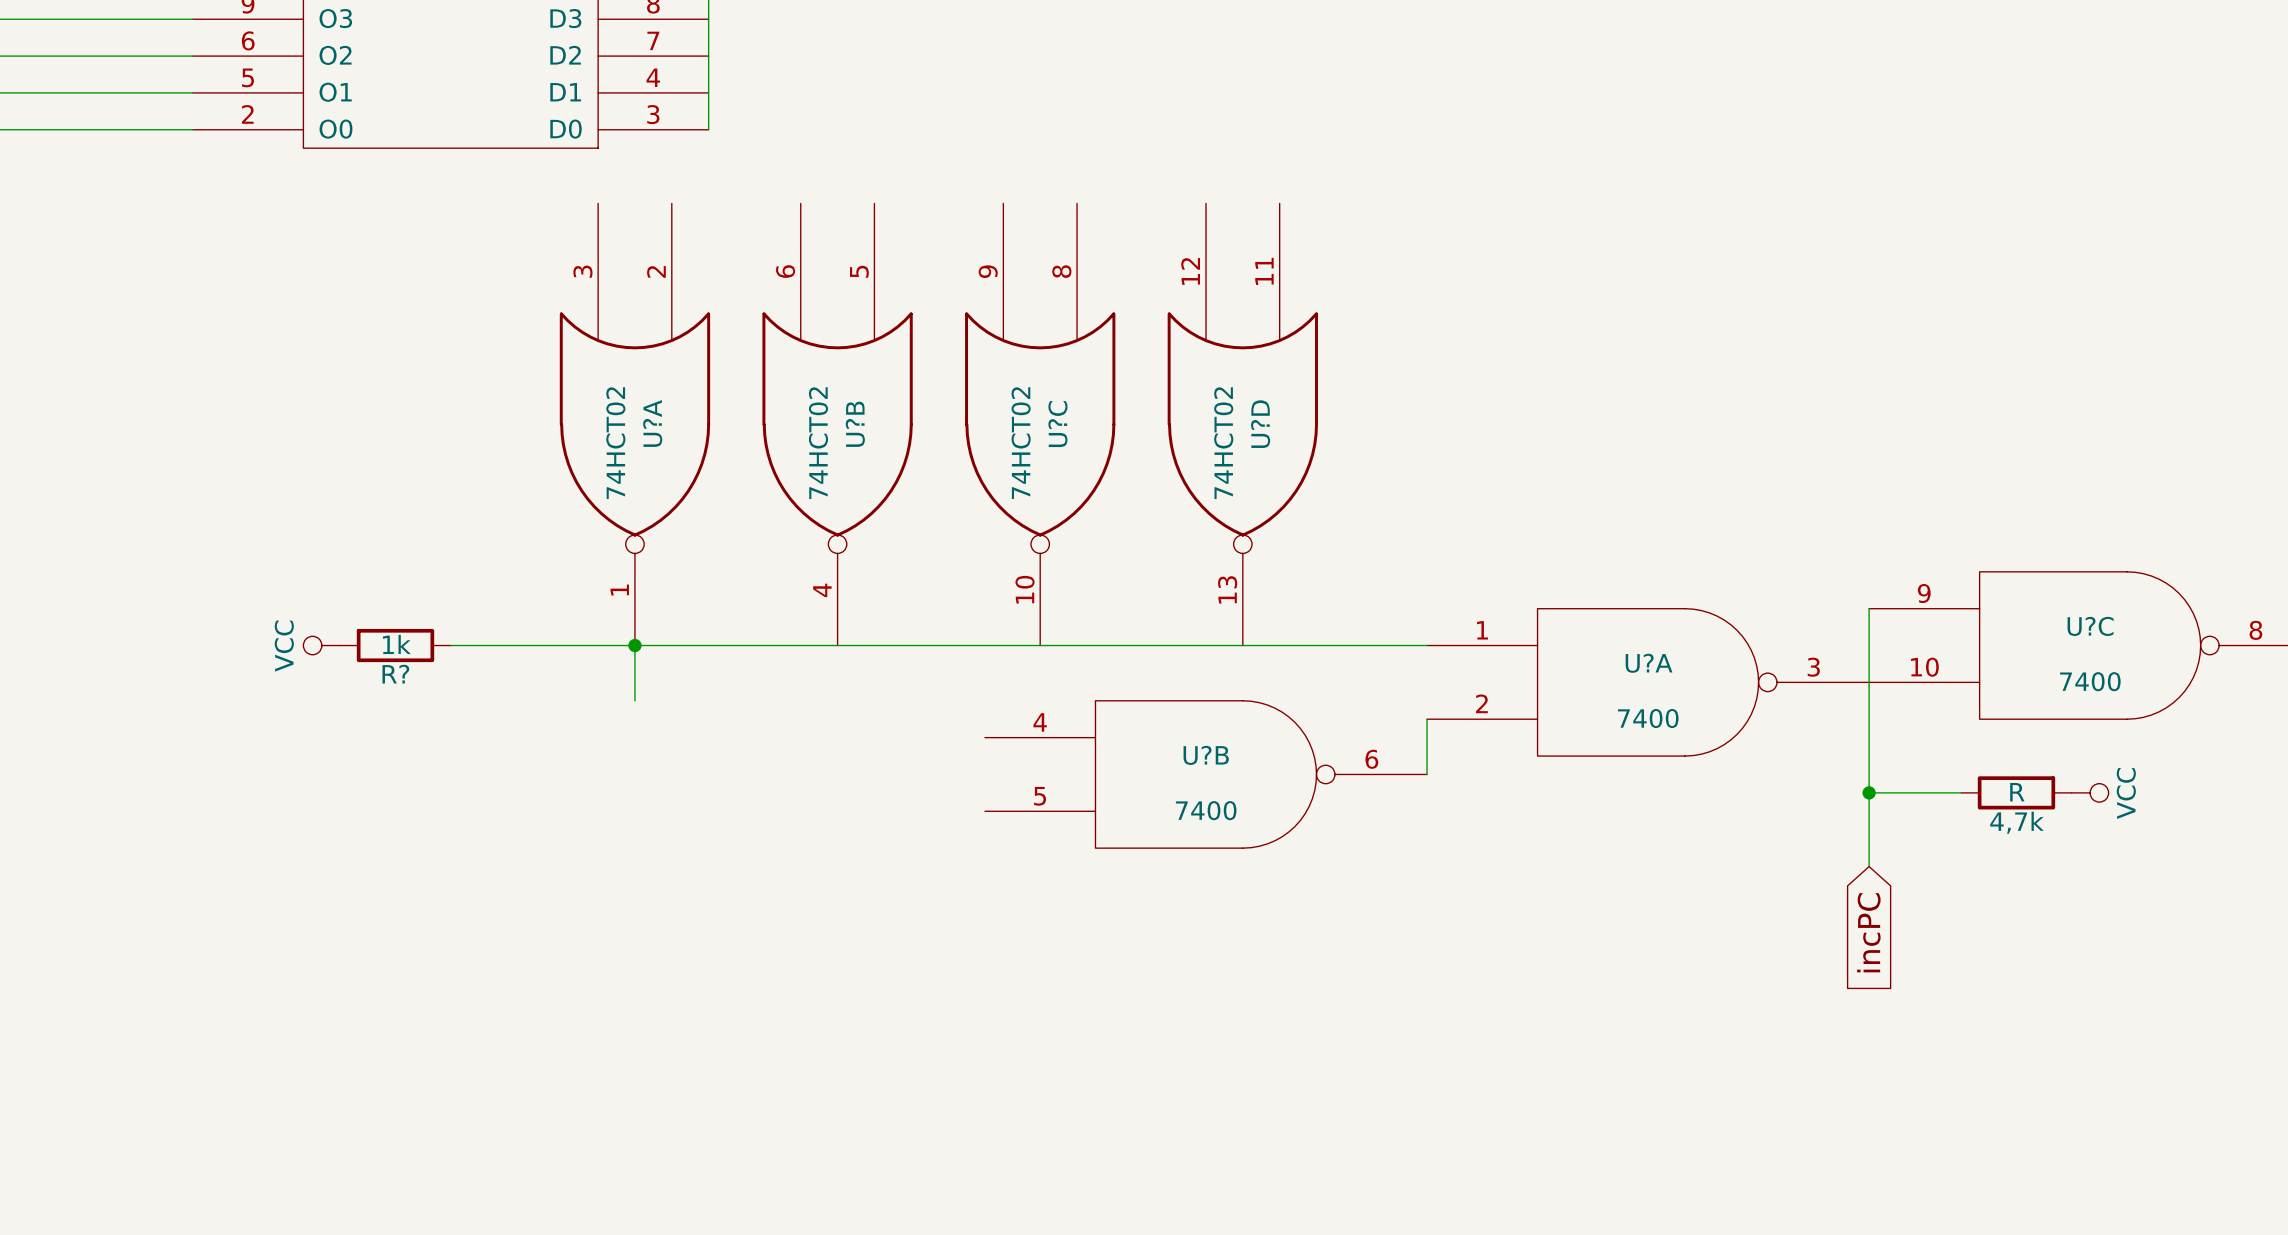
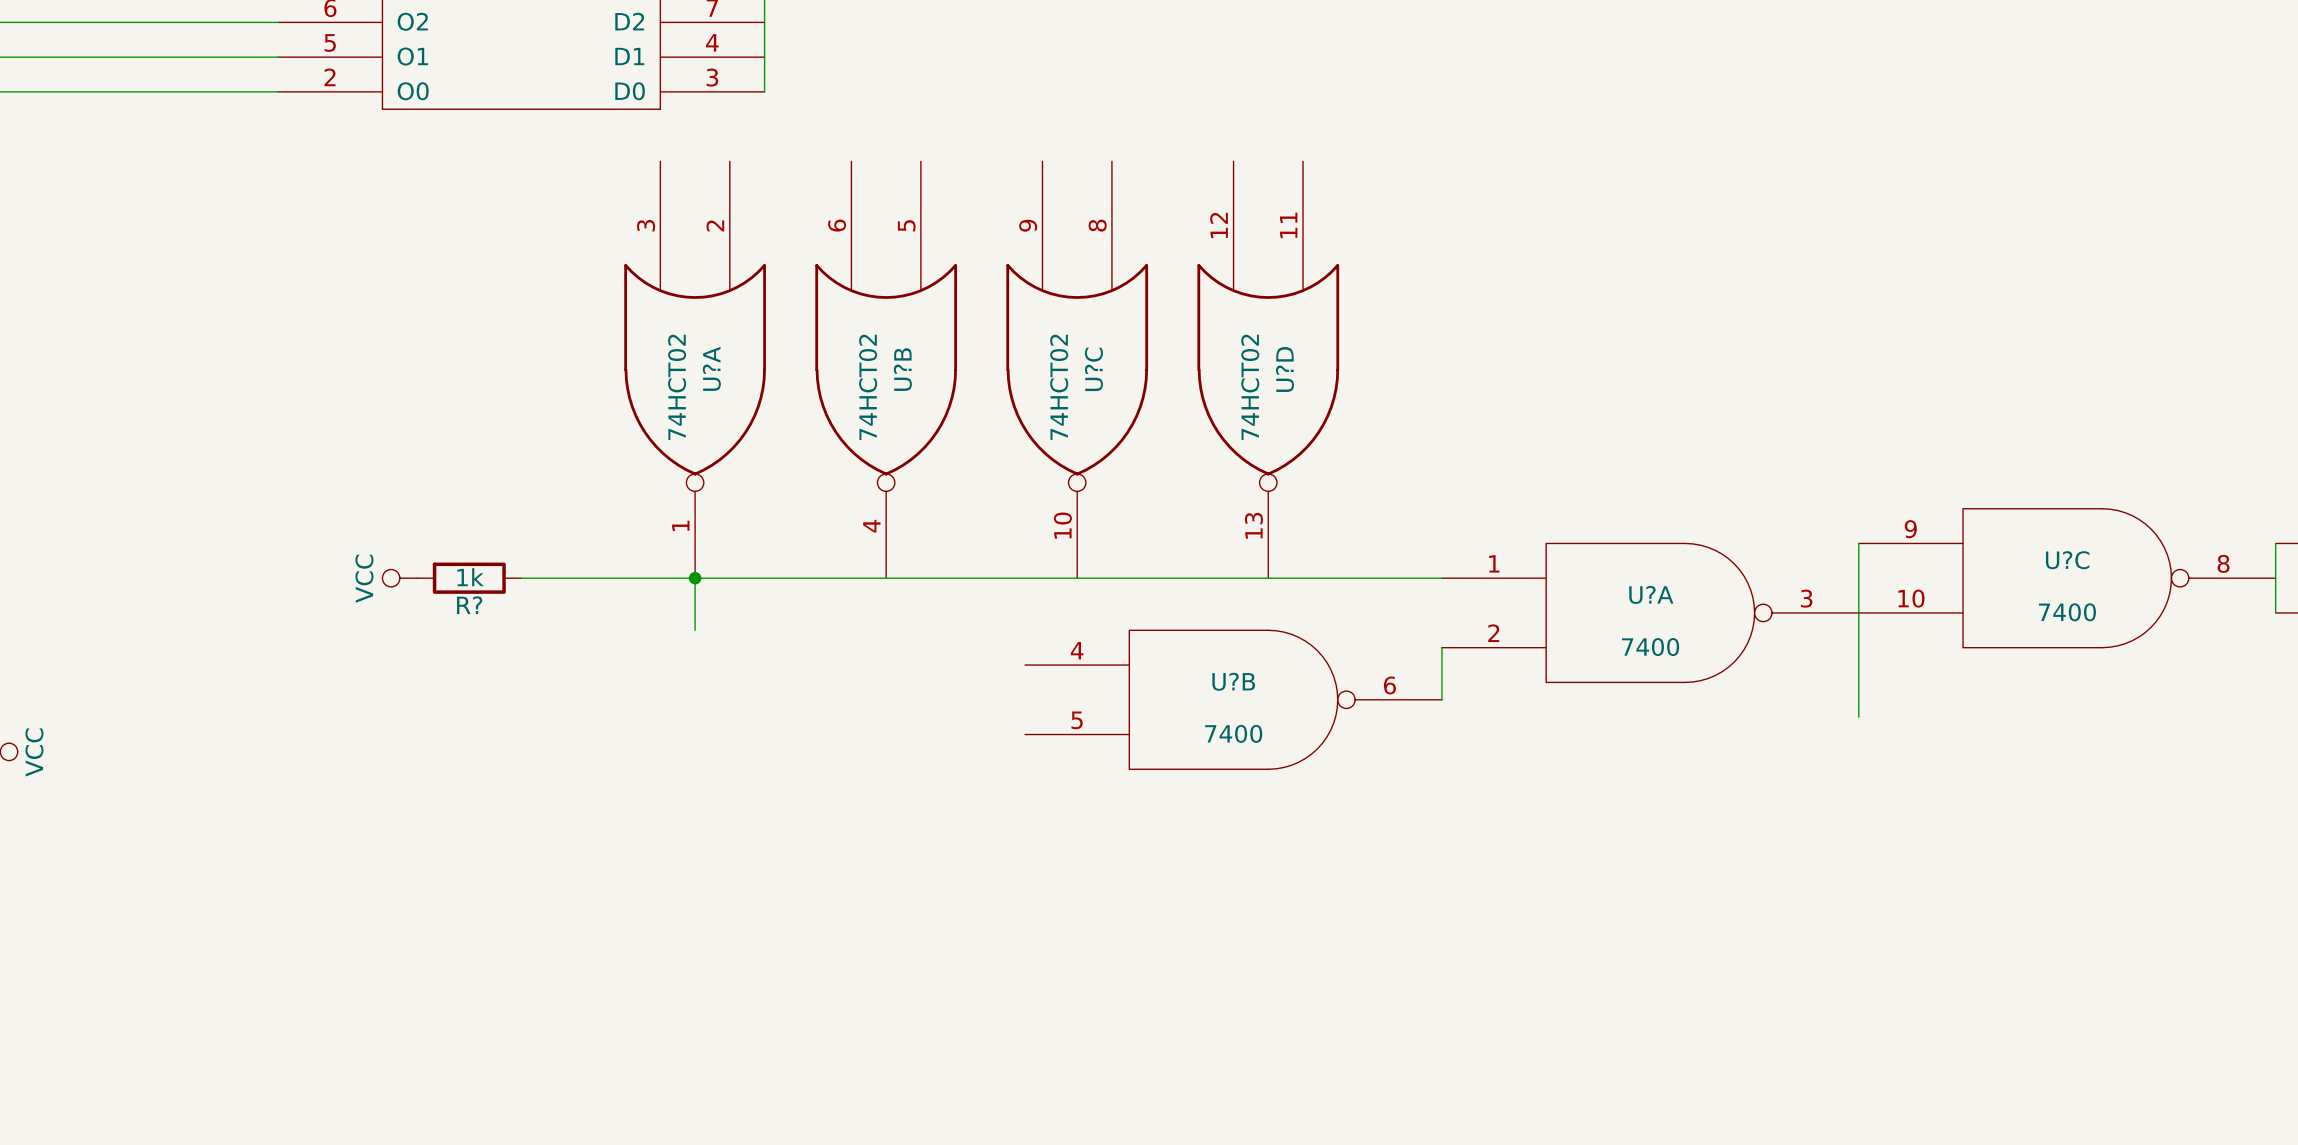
junction: (1869, 792) -> none
wire: (1961, 792) (1869, 792) (1869, 866) -> none
4,7k: R (2016, 792) -> none
power symbol: VCC (2090, 792) -> none
global label: incPC (1868, 932) -> none

